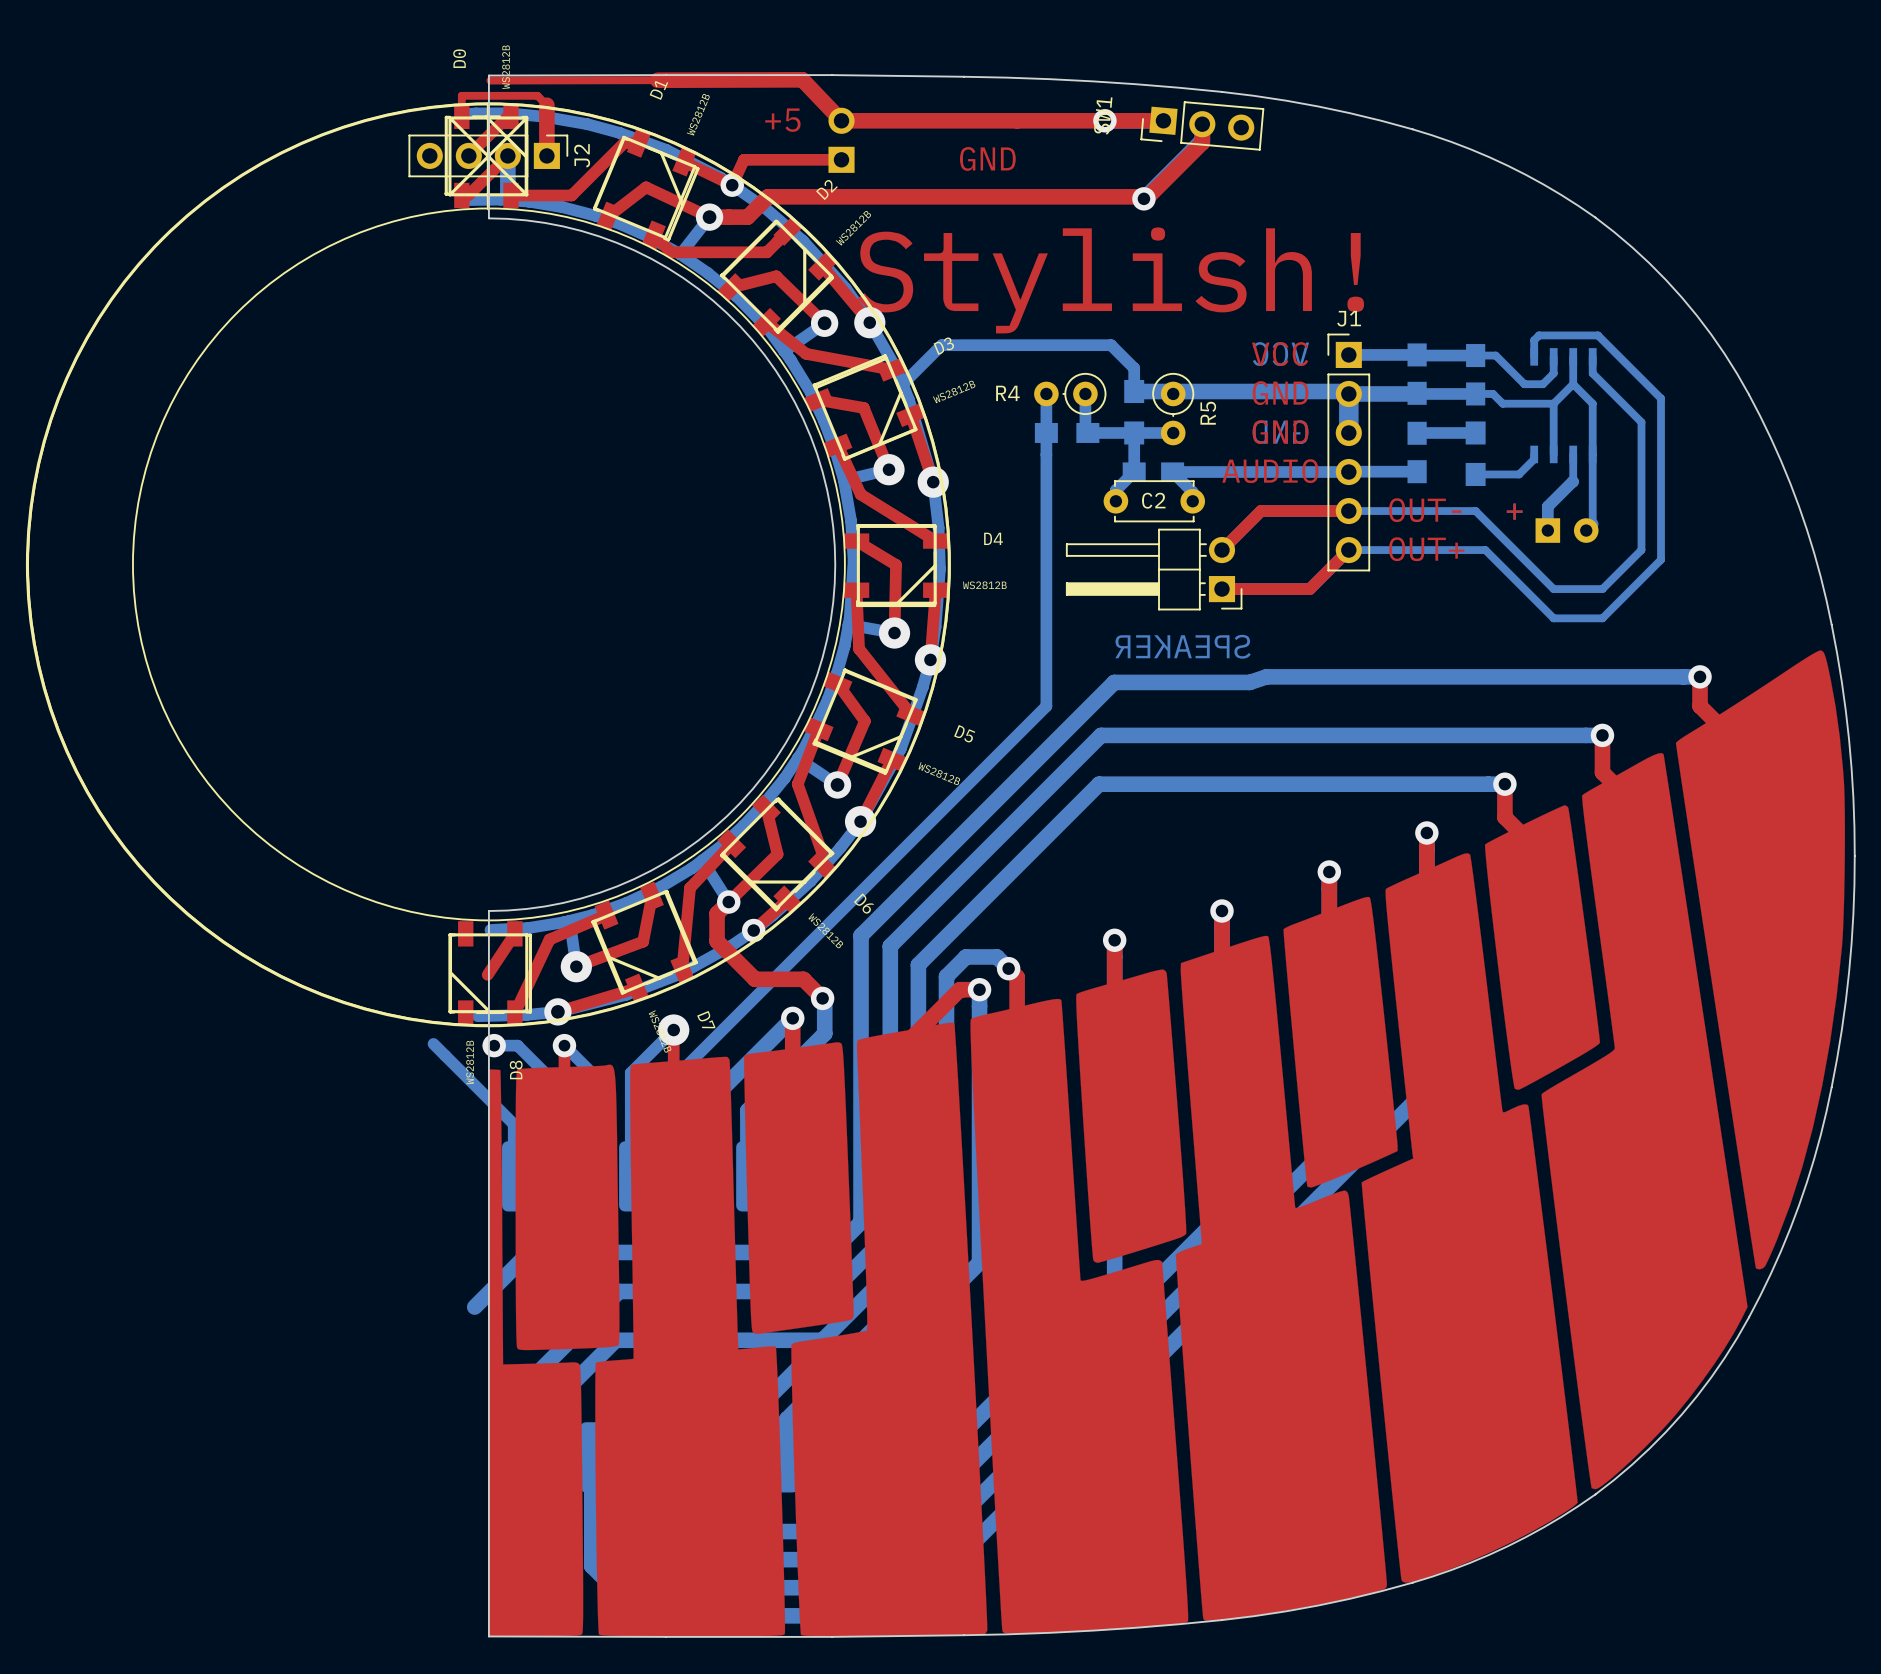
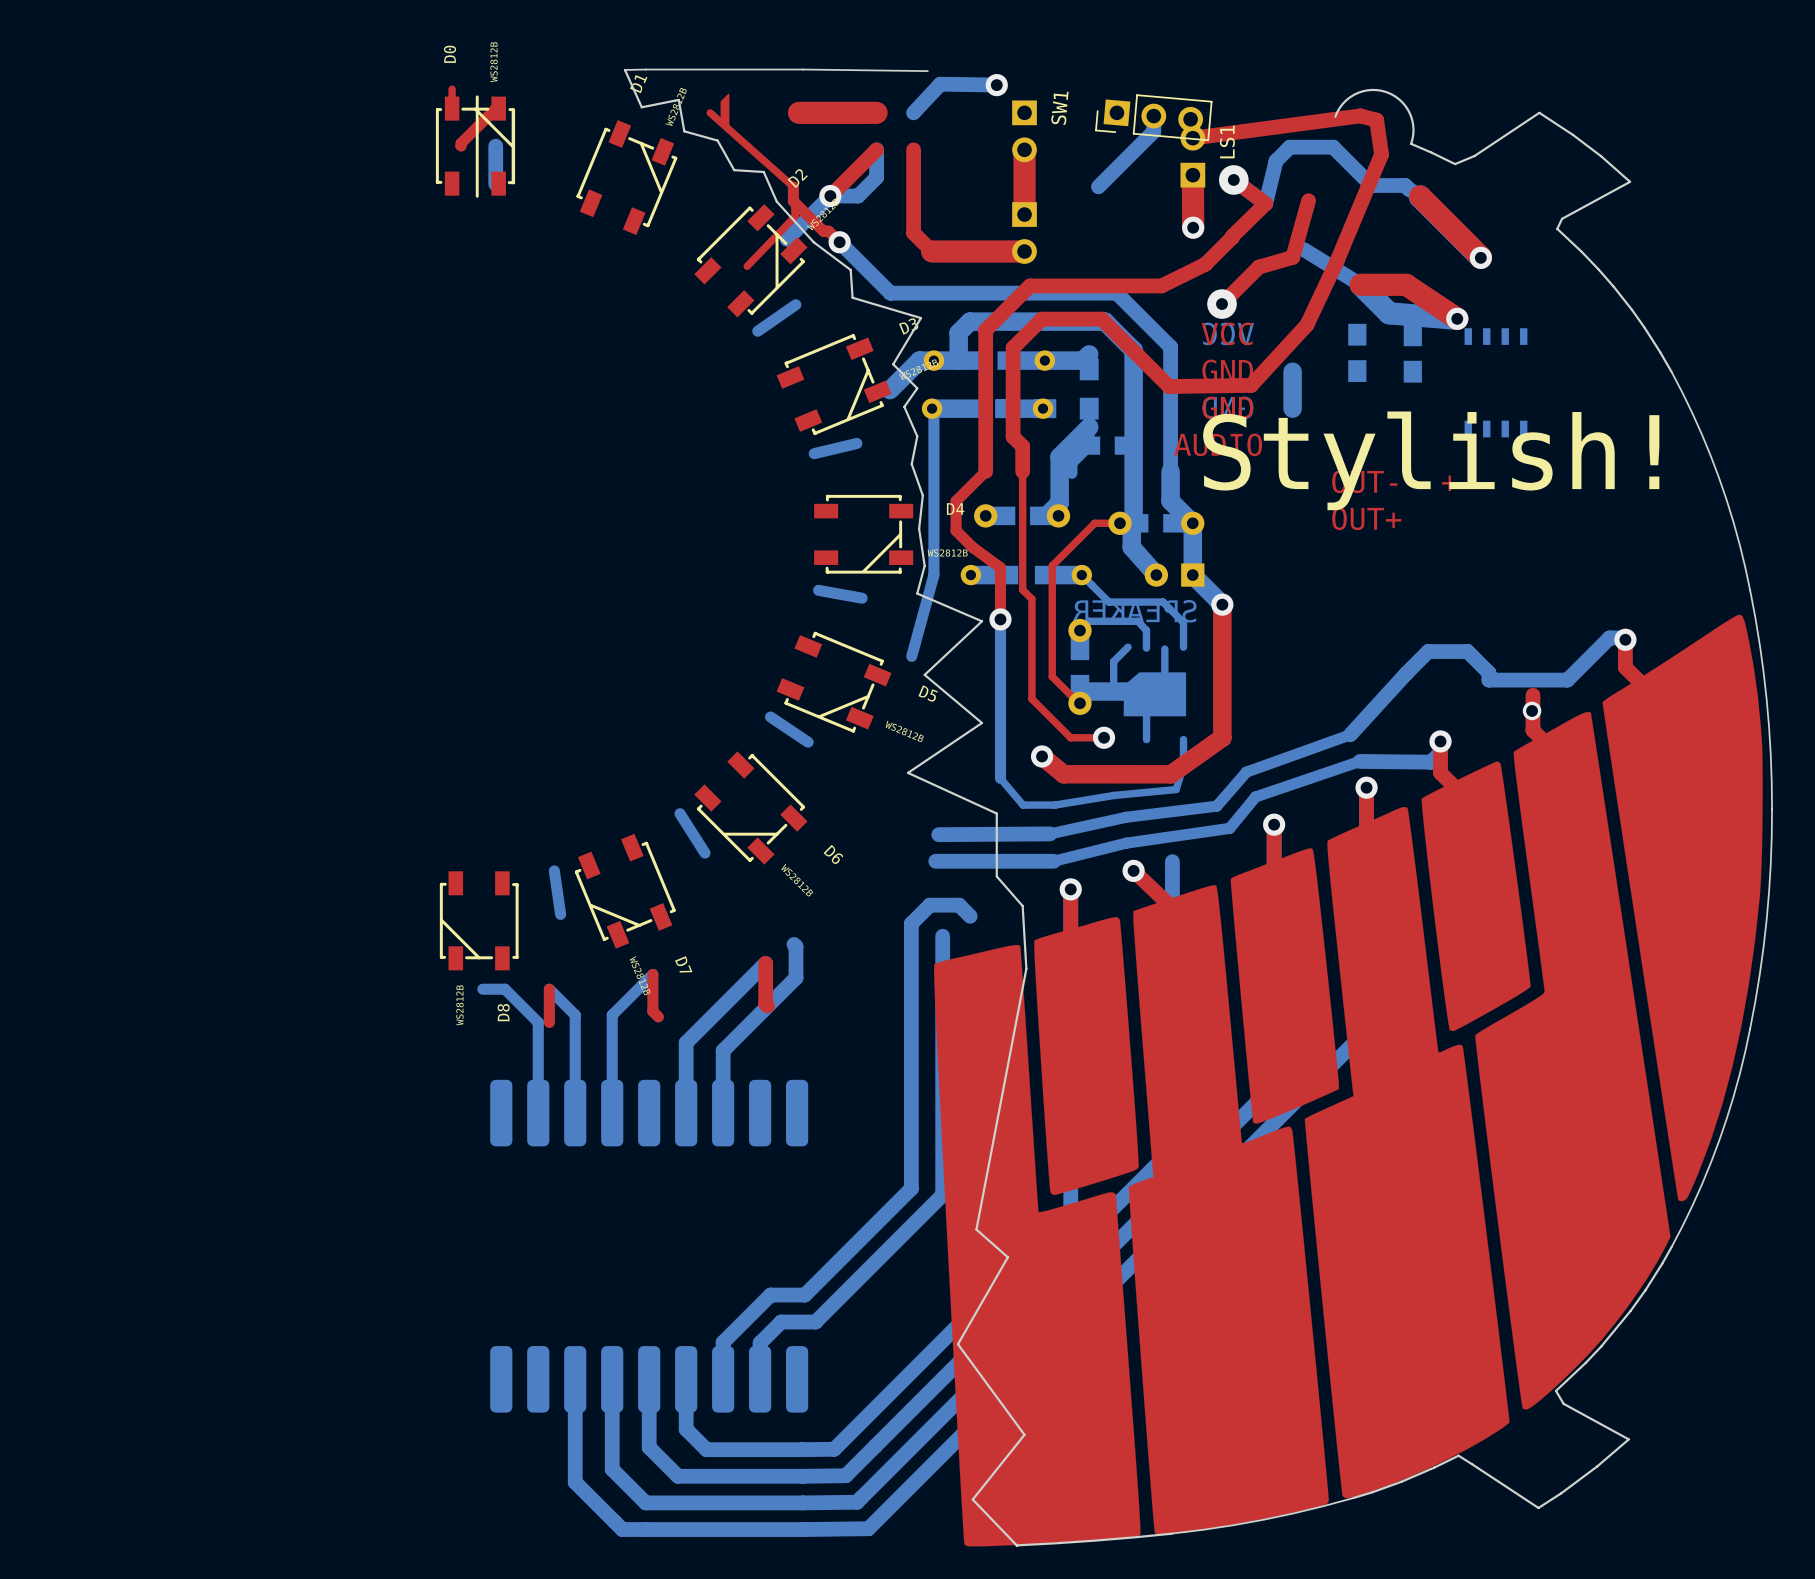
board edge: (666, 75) (488, 75) (488, 218) (526, 220) (563, 226) (599, 236) (634, 250) (667, 267) (698, 288) (727, 313) (752, 340) (785, 386) (803, 419) (817, 454) (827, 490) (833, 527) (835, 564) (833, 602) (827, 639) (817, 675) (794, 726) (775, 759) (752, 788) (713, 828) (667, 861) (617, 886) (563, 902) (526, 908) (488, 911) (488, 1636) (832, 1636) (1050, 1632) (1136, 1627) (1254, 1616) (1318, 1605) (1381, 1591) (1432, 1576) (1489, 1554) (1543, 1527) (1595, 1494) (1649, 1448) (1681, 1414) (1711, 1377) (1748, 1317) -> (645, 69) (625, 69) (641, 107) (678, 99) (684, 131) (717, 140) (734, 170) (763, 172) (776, 201) (813, 242) (850, 270) (852, 297) (920, 318) (893, 364) (917, 388) (904, 406) (917, 436) (911, 464) (922, 495) (919, 528) (924, 565) (917, 593) (982, 621) (924, 674) (982, 722) (908, 772) (996, 813) (996, 876) (1022, 906) (1026, 968) (976, 1229) (1007, 1257) (957, 1344) (1024, 1434) (972, 1499) (1017, 1545) (1133, 1537) (1202, 1529) (1293, 1513) (1353, 1498)
board edge: (963, 76) (1093, 81) (1254, 95) (1318, 106) (1381, 120) (1432, 135) (1470, 149) (1507, 165) (1561, 195) (1595, 217) (1632, 247) (1666, 280) (1696, 315) (1724, 353) (1748, 394) -> (1335, 116) (1342, 104) (1353, 94) (1367, 90) (1386, 92) (1402, 102) (1410, 115) (1413, 129) (1411, 143) (1455, 164) (1474, 156) (1539, 112) (1601, 156) (1630, 181) (1562, 218) (1557, 228) (1613, 286) (1644, 327) (1671, 372)
top track: (490, 80) (802, 79) (841, 120) -> (798, 112) (811, 112)
bottom track: none -> (996, 85) (940, 84) (913, 112)
top track: (461, 95) (537, 95) (546, 105) (546, 155) -> none
drawing: none -> [720, 93, 730, 133]
drawing: [25, 102, 951, 1028] -> none
bottom track: (468, 113) (508, 113) (587, 124) (619, 132) (666, 149) (732, 185) (765, 208) (803, 241) (845, 288) (869, 322) (897, 370) (909, 400) (933, 482) (938, 527) (940, 568) (935, 627) (930, 659) (900, 749) (860, 821) (810, 881) (753, 930) (731, 945) (682, 973) (626, 994) (557, 1011) (477, 1016) -> none
line: (449, 117) (449, 194) -> none
line: (449, 117) (526, 194) (449, 194) -> none
line: (449, 117) (526, 117) (449, 194) -> none
top track: none -> (710, 112) (793, 186)
text: +5 (782, 120) -> none
top track width: thin (841, 120) (909, 120) -> thick (811, 112) (876, 112)
top track: (909, 120) (1163, 120) -> none
via position: (1104, 120) -> (996, 85)
top track: (1202, 124) (1202, 142) (1146, 198) (1144, 196) (767, 196) (747, 217) (709, 217) (646, 187) (608, 216) -> none
line: (623, 137) (594, 208) (665, 237) (694, 166) (623, 137) -> none
part: (841, 140) -> none
part: none -> (1024, 131)
top track: (638, 143) (624, 143) (571, 195) (510, 195) -> none
top track: none -> (1192, 138) (1360, 115) (1376, 120) (1381, 154) (1337, 260) (1307, 324) (1251, 385) (1169, 386) (1101, 319) (1041, 319) (1013, 347) (1013, 436) (1022, 446) (1022, 589) (1031, 599) (1031, 699) (1070, 737) (1104, 737)
J2: (488, 155) -> none
top track: (507, 155) (468, 195) (461, 195) -> none
text: GND (987, 158) -> none
top track: (841, 159) (743, 159) (732, 185) (684, 161) -> none
bottom track: none -> (876, 149) (876, 177) (858, 196) (830, 196) (787, 239)
top track: none -> (876, 149) (830, 196)
top track: none -> (913, 149) (913, 233) (932, 251) (1024, 251)
top track: none -> (1024, 149) (1024, 214)
LS1: none -> (1192, 156)
via: (732, 185) -> none
top track: none -> (1192, 175) (1193, 227)
bottom track: none -> (1233, 179) (1265, 203) (1276, 161) (1289, 147) (1333, 147) (1371, 185) (1405, 185) (1420, 196) (1480, 257)
top track: none -> (1233, 179) (1265, 203) (1205, 264) (1161, 285) (1029, 285) (985, 330) (985, 471) (956, 501) (956, 530) (972, 547) (1000, 567) (1000, 619)
via: none -> (1233, 179)
top track: none -> (793, 186) (795, 216) (747, 266)
top track: none -> (793, 186) (793, 201) (823, 231) (828, 231) (839, 242)
via: (1143, 198) -> none
bottom track: (468, 200) (528, 201) (562, 207) (621, 224) (680, 254) -> none
via: none -> (830, 196)
top track: none -> (1420, 196) (1480, 257)
top track: none -> (1308, 200) (1292, 257) (1258, 267) (1222, 304)
bottom track: (709, 217) (680, 254) -> none
via: (709, 217) -> none
line: (777, 221) (722, 276) (777, 330) (831, 276) (777, 221) -> none
top track: (787, 231) (766, 252) (671, 252) (653, 235) -> none
via: none -> (1193, 227)
part: none -> (1024, 233)
bottom track: (680, 254) (736, 296) (768, 329) (810, 392) (824, 421) (843, 480) (851, 520) (853, 560) (849, 618) (844, 646) (828, 698) (803, 750) (784, 778) (764, 803) (724, 843) (692, 868) (661, 886) (625, 903) (592, 915) (563, 922) (528, 927) (490, 929) -> none
bottom track: none -> (839, 242) (890, 293) (1116, 293) (1170, 347) (1170, 501) (1192, 523) (1192, 575) (1222, 604)
via: none -> (839, 242)
bottom track: none -> (1303, 249) (1360, 284) (1389, 313) (1457, 318)
top track: (822, 266) (869, 322) -> none
via: none -> (1480, 257)
text: Stylish! (1110, 280) -> none
top track: (731, 287) (776, 276) (824, 323) -> none
top track: none -> (1360, 284) (1406, 284) (1457, 318)
top track: (766, 322) (806, 353) (892, 369) -> none
via: (869, 322) -> none
via: none -> (1222, 304)
via: (824, 323) -> none
via: none -> (1457, 318)
bottom track: (1348, 354) (1495, 355) (1524, 384) (1542, 384) (1553, 373) (1553, 356) -> none
bottom track: (1534, 356) (1534, 340) (1539, 335) (1597, 335) (1661, 398) (1661, 559) (1602, 618) (1553, 618) (1485, 550) (1348, 550) (1309, 589) (1221, 589) -> none
bottom track: (1573, 356) (1573, 384) -> none
bottom track: (1592, 356) (1592, 373) (1641, 422) (1641, 550) (1602, 589) (1553, 589) (1475, 511) (1261, 511) (1221, 550) -> none
line: (886, 358) (815, 387) (844, 458) (915, 429) (886, 358) -> none
bottom track: none -> (1089, 354) (1083, 360) (1044, 360)
bottom track: none -> (933, 360) (919, 360) (889, 390)
bottom track: none -> (958, 360) (958, 332) (969, 321) (1104, 321) (1133, 350) (1133, 521) (1131, 523) (1131, 547) (1156, 575)
part: none -> (989, 360)
bottom track: (902, 384) (941, 345) (1111, 345) (1134, 368) (1134, 391) (1417, 393) -> none
bottom track: (1573, 384) (1553, 403) -> none
bottom track: (1573, 384) (1592, 403) (1592, 524) (1586, 530) -> none
bottom track: (1046, 393) (1046, 706) (669, 1082) (669, 1201) -> none
R4: (1070, 393) -> none
bottom track: (1085, 393) (1085, 430) (1087, 432) (1173, 432) -> none
bottom track: (1417, 393) (1493, 393) (1502, 403) (1553, 403) -> none
top track: (818, 400) (863, 407) (888, 469) -> none
bottom track: (1553, 403) (1553, 454) -> none
R5: (1173, 409) -> none
top track: (910, 415) (933, 482) -> none
part: none -> (987, 408)
bottom track: (1475, 432) (1417, 433) -> none
bottom track: none -> (933, 408) (933, 575) (911, 656)
top track: (837, 445) (860, 494) (935, 541) -> none
bottom track: none -> (1089, 427) (1059, 456) (1059, 502) (1046, 515)
J1: (1348, 452) -> none
part: (1417, 452) -> none
part: (1475, 453) -> none
bottom track: (1534, 454) (1534, 459) (1519, 474) (1475, 474) -> none
bottom track: (1573, 454) (1573, 481) (1547, 506) (1547, 530) -> none
via: (888, 469) -> none
bottom track: (1417, 471) (1172, 472) (1192, 492) (1192, 501) -> none
via: (933, 482) -> none
text: none -> Stylish! (1431, 460)
C2: (1154, 501) -> none
top track: (1348, 511) (1261, 511) (1221, 550) -> none
line: (858, 526) (935, 526) (935, 603) (858, 603) (858, 526) -> none
part rotation: 0° (1567, 530) -> 180° (1174, 575)
part position: (1567, 530) -> (1174, 575)
top track: (856, 541) (896, 564) (894, 633) -> none
part: none -> (1022, 515)
top track: (1348, 550) (1309, 589) (1221, 589) -> none
top track: none -> (1119, 523) (1094, 523) (1052, 565) (1052, 676) (1079, 703)
part: none -> (1156, 523)
part: (1154, 569) -> none
top track: (856, 590) (859, 648) (910, 714) -> none
top track: (935, 590) (930, 659) -> none
part: none -> (1026, 575)
bottom track: none -> (1081, 575) (1108, 602) (1162, 602) (1183, 622) (1183, 647)
via: (894, 633) -> none
top track: none -> (1222, 604) (1222, 737) (1171, 774) (1063, 774) (1042, 756)
via: none -> (1222, 604)
bottom track: none -> (1000, 619) (1000, 778) (1023, 805) (1055, 805) (1114, 795) (1176, 789) (1183, 765) (1183, 739)
via: none -> (1000, 619)
via: (930, 659) -> none
line: (844, 670) (915, 700) (886, 771) (815, 741) (844, 670) -> none
bottom track: none -> (1622, 637) (1609, 637) (1567, 680) (1488, 680) (1488, 672) (1467, 651) (1428, 651) (1350, 734) (1246, 772) (1216, 806) (1126, 817) (1050, 833) (938, 834)
bottom track: (1700, 676) (1266, 676) (1249, 682) (1114, 682) (861, 935) (861, 1222) (830, 1252) (529, 1252) (474, 1307) -> none
bottom track: none -> (1079, 643) (1079, 630) (1089, 621) (1138, 621) (1146, 630) (1146, 648)
top track: (837, 683) (864, 721) (837, 784) -> none
bottom track: none -> (1128, 647) (1113, 661) (1113, 692)
bottom track: none -> (1164, 649) (1164, 688) (1146, 706)
part: none -> (1079, 666)
drawing: none -> [1123, 672, 1187, 717]
top track: (818, 729) (797, 784) (822, 852) -> none
bottom track: none -> (1079, 691) (1131, 691) (1146, 706)
bottom track: (1602, 735) (1101, 735) (890, 946) (890, 1232) (831, 1291) (619, 1291) (513, 1396) (513, 1435) -> none
via: (1602, 735) -> none
bottom track: none -> (1146, 706) (1146, 739)
via: none -> (1532, 710)
top track: (892, 759) (860, 821) -> none
via: none -> (1104, 737)
via: (837, 784) -> none
bottom track: (1504, 784) (1099, 784) (918, 964) (918, 1244) (822, 1340) (615, 1340) (552, 1403) (552, 1435) -> none
line: (777, 799) (831, 853) (777, 907) (722, 853) (777, 799) -> none
bottom track: none -> (1437, 755) (1430, 762) (1359, 761) (1255, 796) (1229, 828) (1126, 843) (1053, 861) (935, 861)
via: none -> (1042, 756)
top track: (766, 809) (777, 854) (717, 913) (717, 941) (755, 979) (803, 979) (822, 998) -> none
via: (860, 821) -> none
top track: (731, 843) (690, 888) (682, 969) -> none
line: (665, 891) (694, 962) (623, 992) (594, 921) (665, 891) -> none
top track: (652, 896) (643, 941) (576, 966) -> none
top track: (787, 899) (753, 930) -> none
via: (728, 902) -> none
top track: (1221, 911) (1221, 959) -> (1133, 870) (1172, 907)
via position: (1221, 911) -> (1133, 870)
top track: (606, 915) (549, 939) (514, 1013) -> none
via: (753, 930) -> none
top track: (514, 933) (487, 974) -> none
line: (449, 934) (526, 934) (526, 1011) (449, 1011) (449, 934) -> none
via: (576, 966) -> none
top track: (1008, 968) (1017, 977) (1017, 1022) -> none
via: (1008, 968) -> none
top track: (636, 988) (557, 1011) -> none
top track: (979, 989) (959, 989) (903, 1045) -> none
via: (979, 989) -> none
via: (822, 998) -> none
via: (557, 1011) -> none
via: (792, 1018) -> none
via: (673, 1030) -> none
bottom track: (433, 1043) (513, 1124) (513, 1201) -> none
via: (494, 1045) -> none
via: (564, 1045) -> none
part: none -> (1348, 1080)
part: (1166, 1143) -> none
board edge: none -> (1671, 1246) (1630, 1310) (1601, 1346) (1555, 1390) (1563, 1403) (1628, 1439) (1597, 1466) (1538, 1507) (1458, 1455) (1401, 1481) (1353, 1498)

